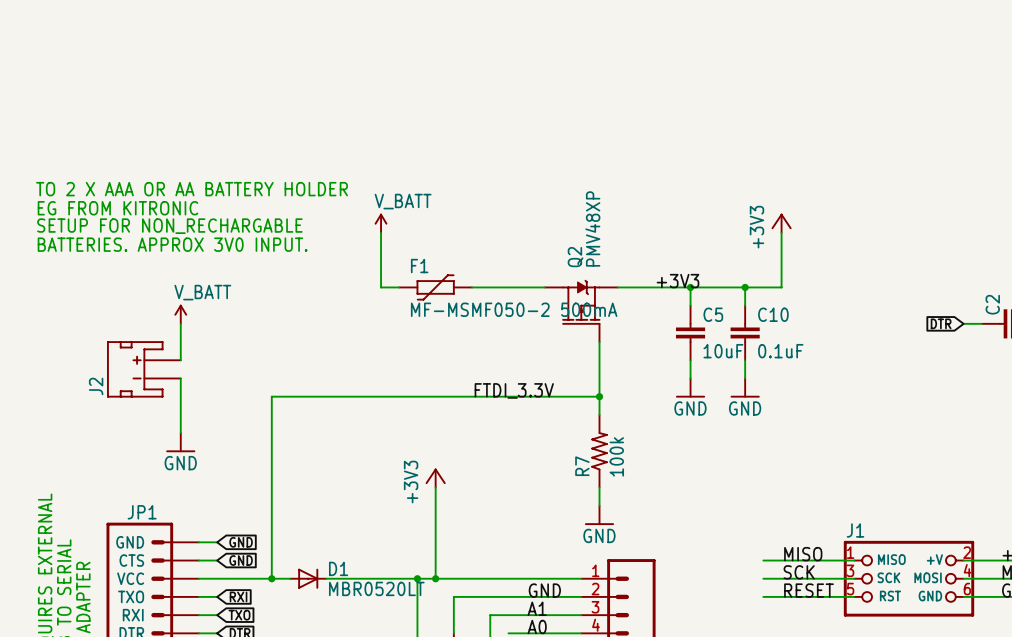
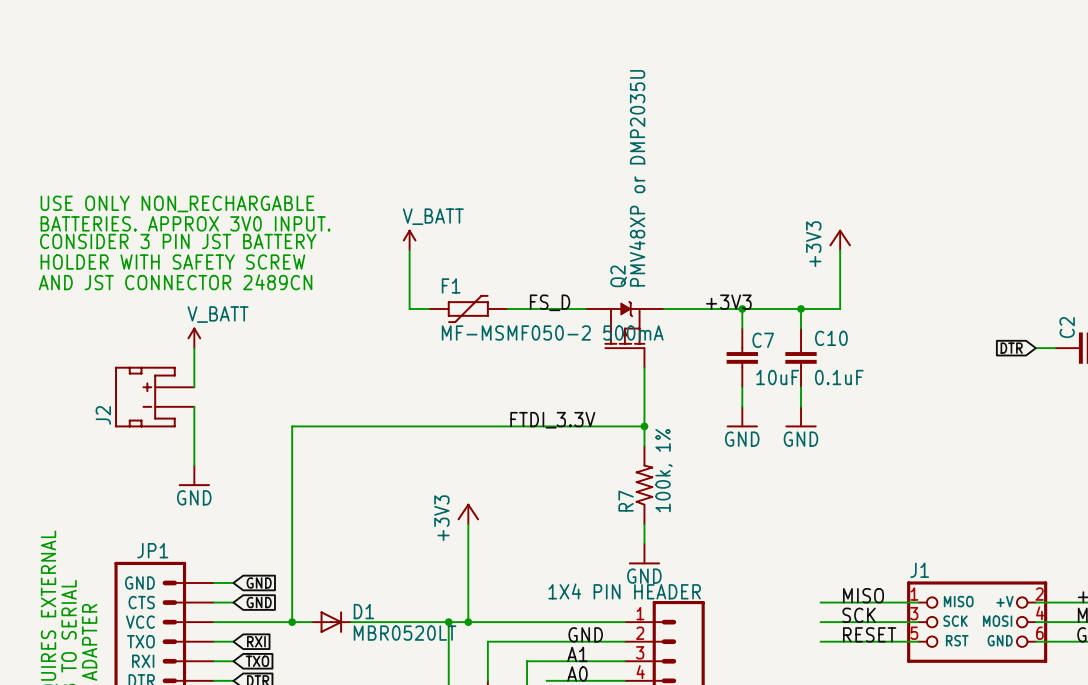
text: TO 2 X AAA OR AA BATTERY HOLDER (192, 189) -> USE ONLY NON_RECHARGABLE (177, 203)
text: EG FROM KITRONIC (118, 208) -> BATTERIES. APPROX 3V0 INPUT. (185, 223)
text: SETUP FOR NON_RECHARGABLE (169, 226) -> CONSIDER 3 PIN JST BATTERY (178, 241)
Q2 value: PMV48XP (592, 228) -> PMV48XP or DMP2035U (637, 178)
text: BATTERIES. APPROX 3V0 INPUT. (172, 244) -> HOLDER WITH SAFETY SCREW (172, 262)
text: none -> AND JST CONNECTOR 2489CN (175, 282)
label: none -> FS_D (550, 302)
C5 name: C5 (713, 314) -> C7 (763, 340)
R7 value: 100k (616, 456) -> 100k, 1% (664, 470)
part value: none -> 1X4 PIN HEADER (624, 591)

